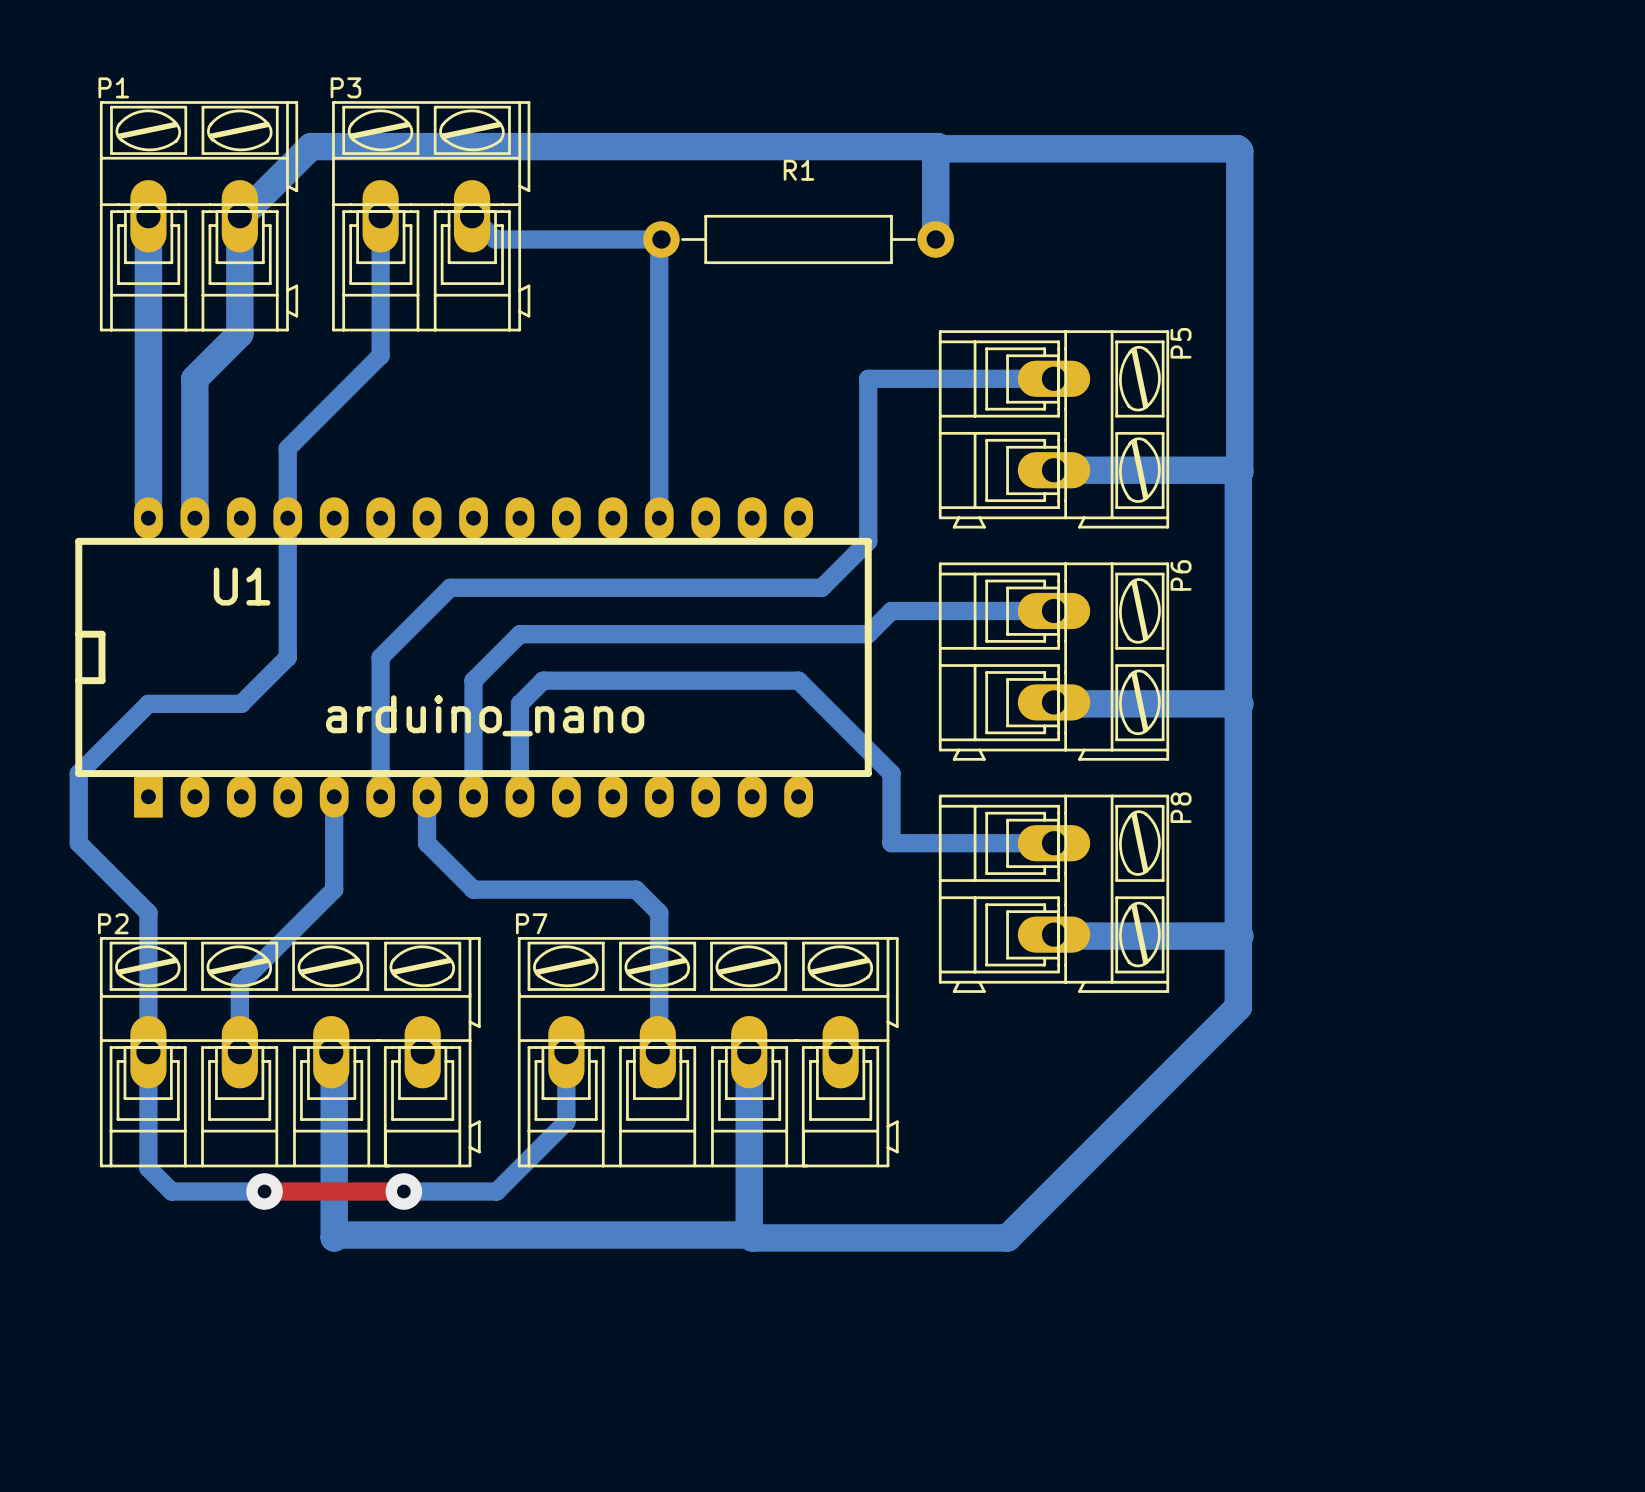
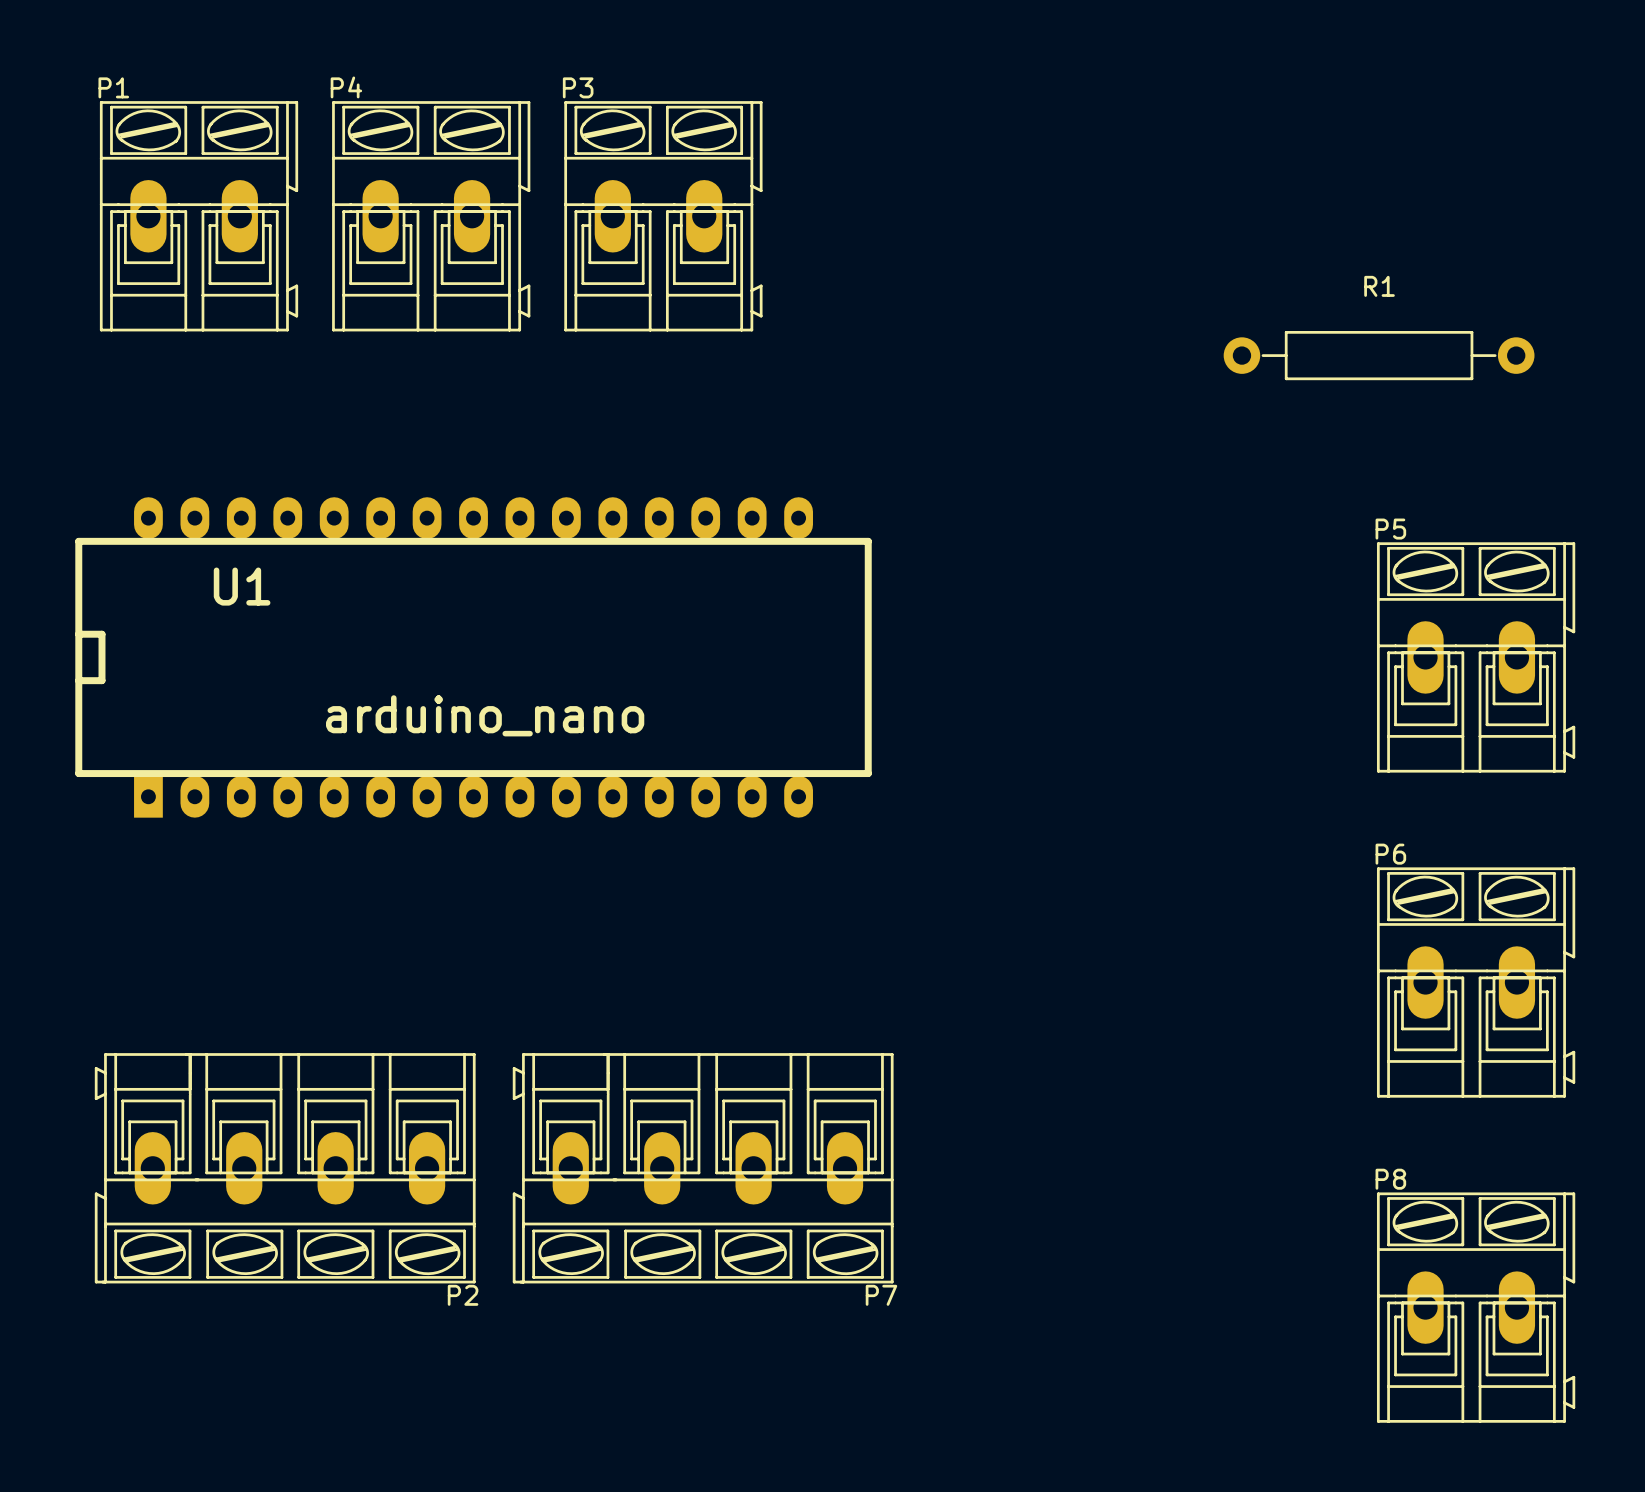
P3 name: P3 (345, 87) -> P4 (346, 87)
bottom track: (935, 148) (1237, 148) (1239, 151) (1239, 471) (1238, 470) -> none
bottom track: (935, 148) (935, 239) -> none
bottom track: (935, 148) (937, 146) (310, 146) (239, 216) (239, 333) (194, 378) (194, 518) -> none
bottom track: (148, 216) (148, 518) -> none
bottom track: (380, 216) (380, 355) (287, 448) (287, 657) (241, 703) (148, 703) (78, 773) (78, 843) (148, 912) (148, 1168) (171, 1191) (264, 1191) -> none
bottom track: (472, 216) (495, 239) (661, 239) (659, 241) (659, 518) -> none
P3: none -> (663, 216)
R1 position: (798, 239) -> (1379, 355)
bottom track: (1054, 378) (868, 378) (868, 541) (821, 587) (450, 587) (380, 657) (380, 796) -> none
P5 rotation: 0° (1054, 429) -> 90° counterclockwise (1476, 657)
P5 position: (1054, 429) -> (1476, 657)
bottom track: (1054, 470) (1238, 470) -> none
bottom track: (1238, 470) (1238, 1007) (1007, 1237) (752, 1237) (749, 1235) -> none
bottom track: (1054, 611) (891, 611) (868, 634) (519, 634) (473, 680) (473, 796) -> none
P6 rotation: 0° (1054, 661) -> 90° counterclockwise (1476, 982)
P6 position: (1054, 661) -> (1476, 982)
bottom track: (1054, 702) (1239, 703) (1238, 702) -> none
bottom track: (334, 796) (334, 889) (239, 983) (239, 1052) -> none
bottom track: (427, 796) (427, 843) (473, 889) (636, 889) (659, 912) (657, 1052) -> none
bottom track: (519, 796) (519, 703) (543, 680) (798, 680) (891, 773) (891, 843) (1054, 843) -> none
P8 rotation: 0° (1054, 893) -> 90° counterclockwise (1476, 1307)
P8 position: (1054, 893) -> (1476, 1307)
bottom track: (1054, 934) (1239, 936) (1238, 934) -> none
P2 rotation: 0° (290, 1052) -> 180° (285, 1168)
bottom track: (331, 1052) (334, 1055) (334, 1237) (337, 1235) (749, 1235) -> none
bottom track: (566, 1052) (566, 1121) (496, 1191) (403, 1191) -> none
P7 rotation: 0° (708, 1052) -> 180° (703, 1168)
bottom track: (749, 1052) (749, 1235) -> none
top track: (264, 1191) (403, 1191) -> none
via: (264, 1191) -> none
via: (403, 1191) -> none

